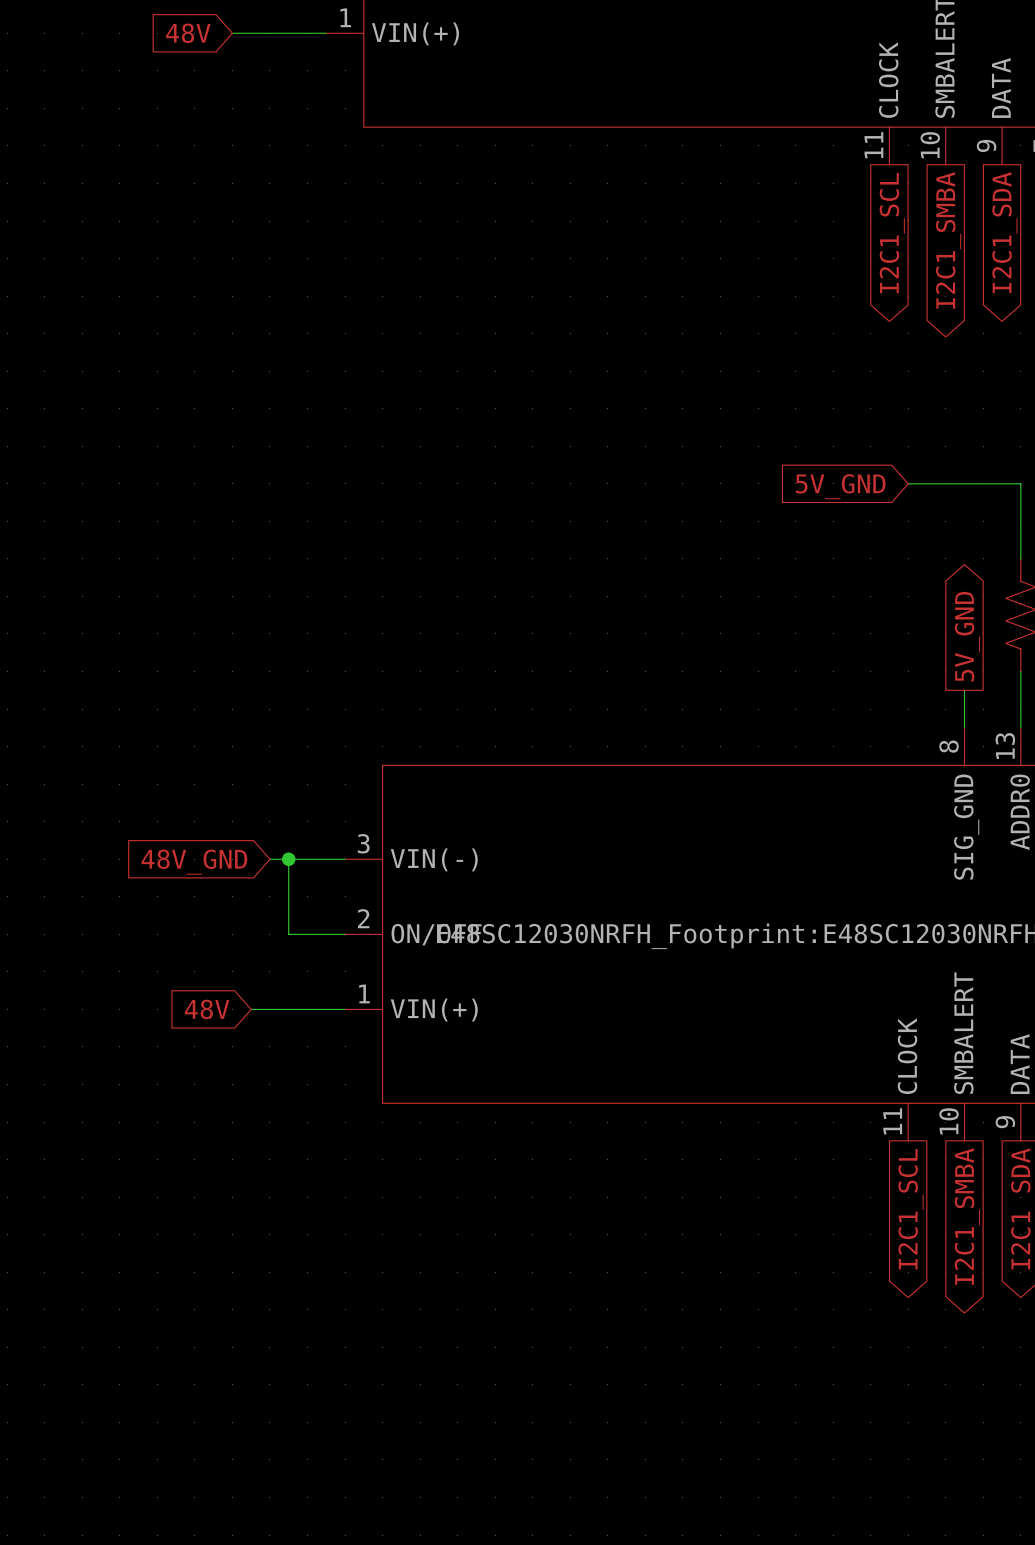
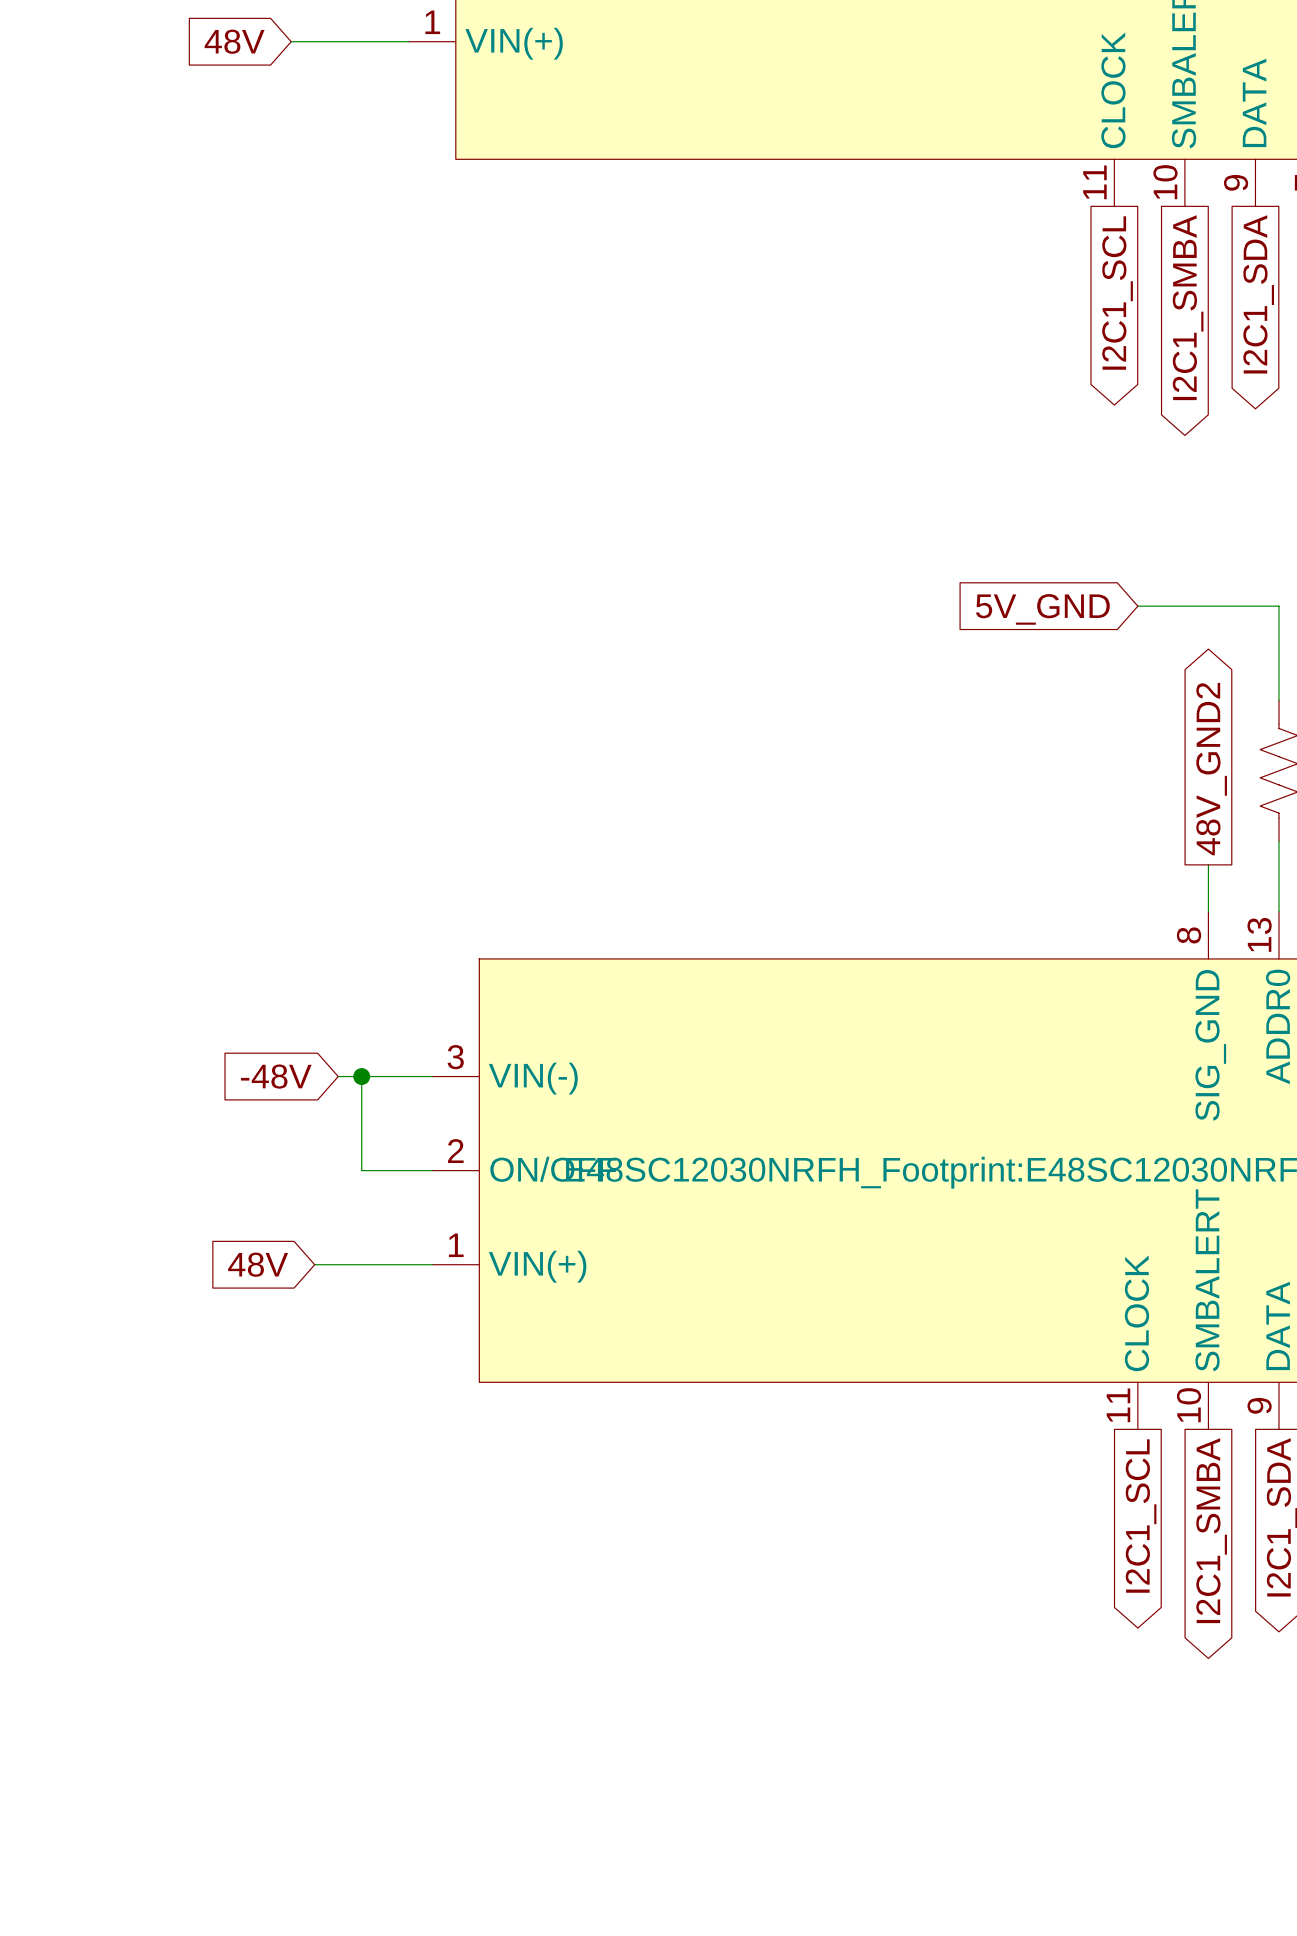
global label: 5V_GND (967, 636) -> 48V_GND2 (1211, 769)
global label: 48V_GND (194, 862) -> -48V (276, 1076)

